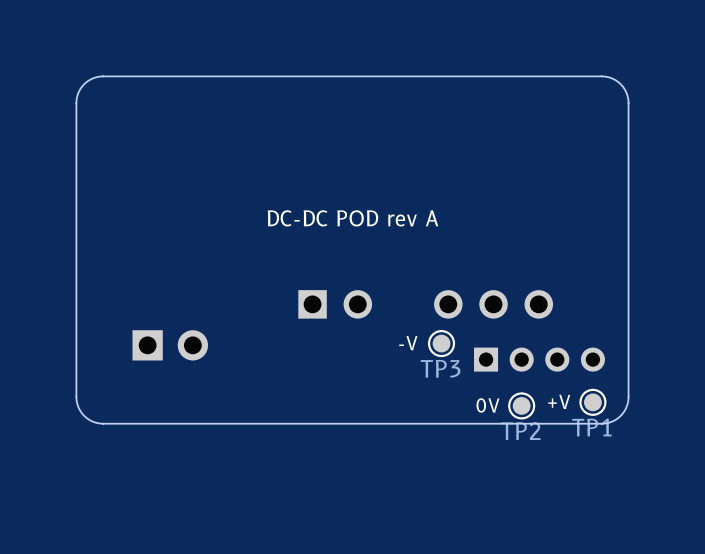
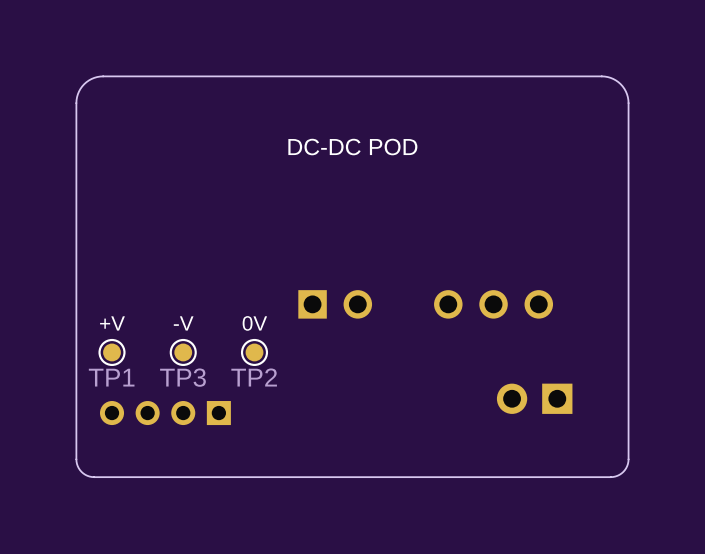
text: none -> DC-DC POD (352, 147)
text: DC-DC POD rev A (353, 218) -> none
text: none -> +V (112, 323)
text position: -V (408, 343) -> -V (183, 323)
TP3 position: (441, 343) -> (183, 352)
part rotation: 0° (170, 345) -> 180° (534, 398)
part position: (170, 345) -> (534, 398)
part rotation: 0° (539, 359) -> 180° (165, 413)
part position: (539, 359) -> (165, 413)
board edge: (628, 397) (627, 405) (620, 415) (610, 422) (601, 423) (103, 423) (92, 421) (84, 415) (78, 407) (76, 397) -> (628, 397) (627, 463) (621, 473) (610, 477) (91, 477) (81, 471) (76, 461) (76, 397)
text: +V (559, 401) -> none
TP1 position: (592, 402) -> (112, 352)
text position: 0V (487, 405) -> 0V (254, 323)
TP2 position: (521, 405) -> (254, 352)

